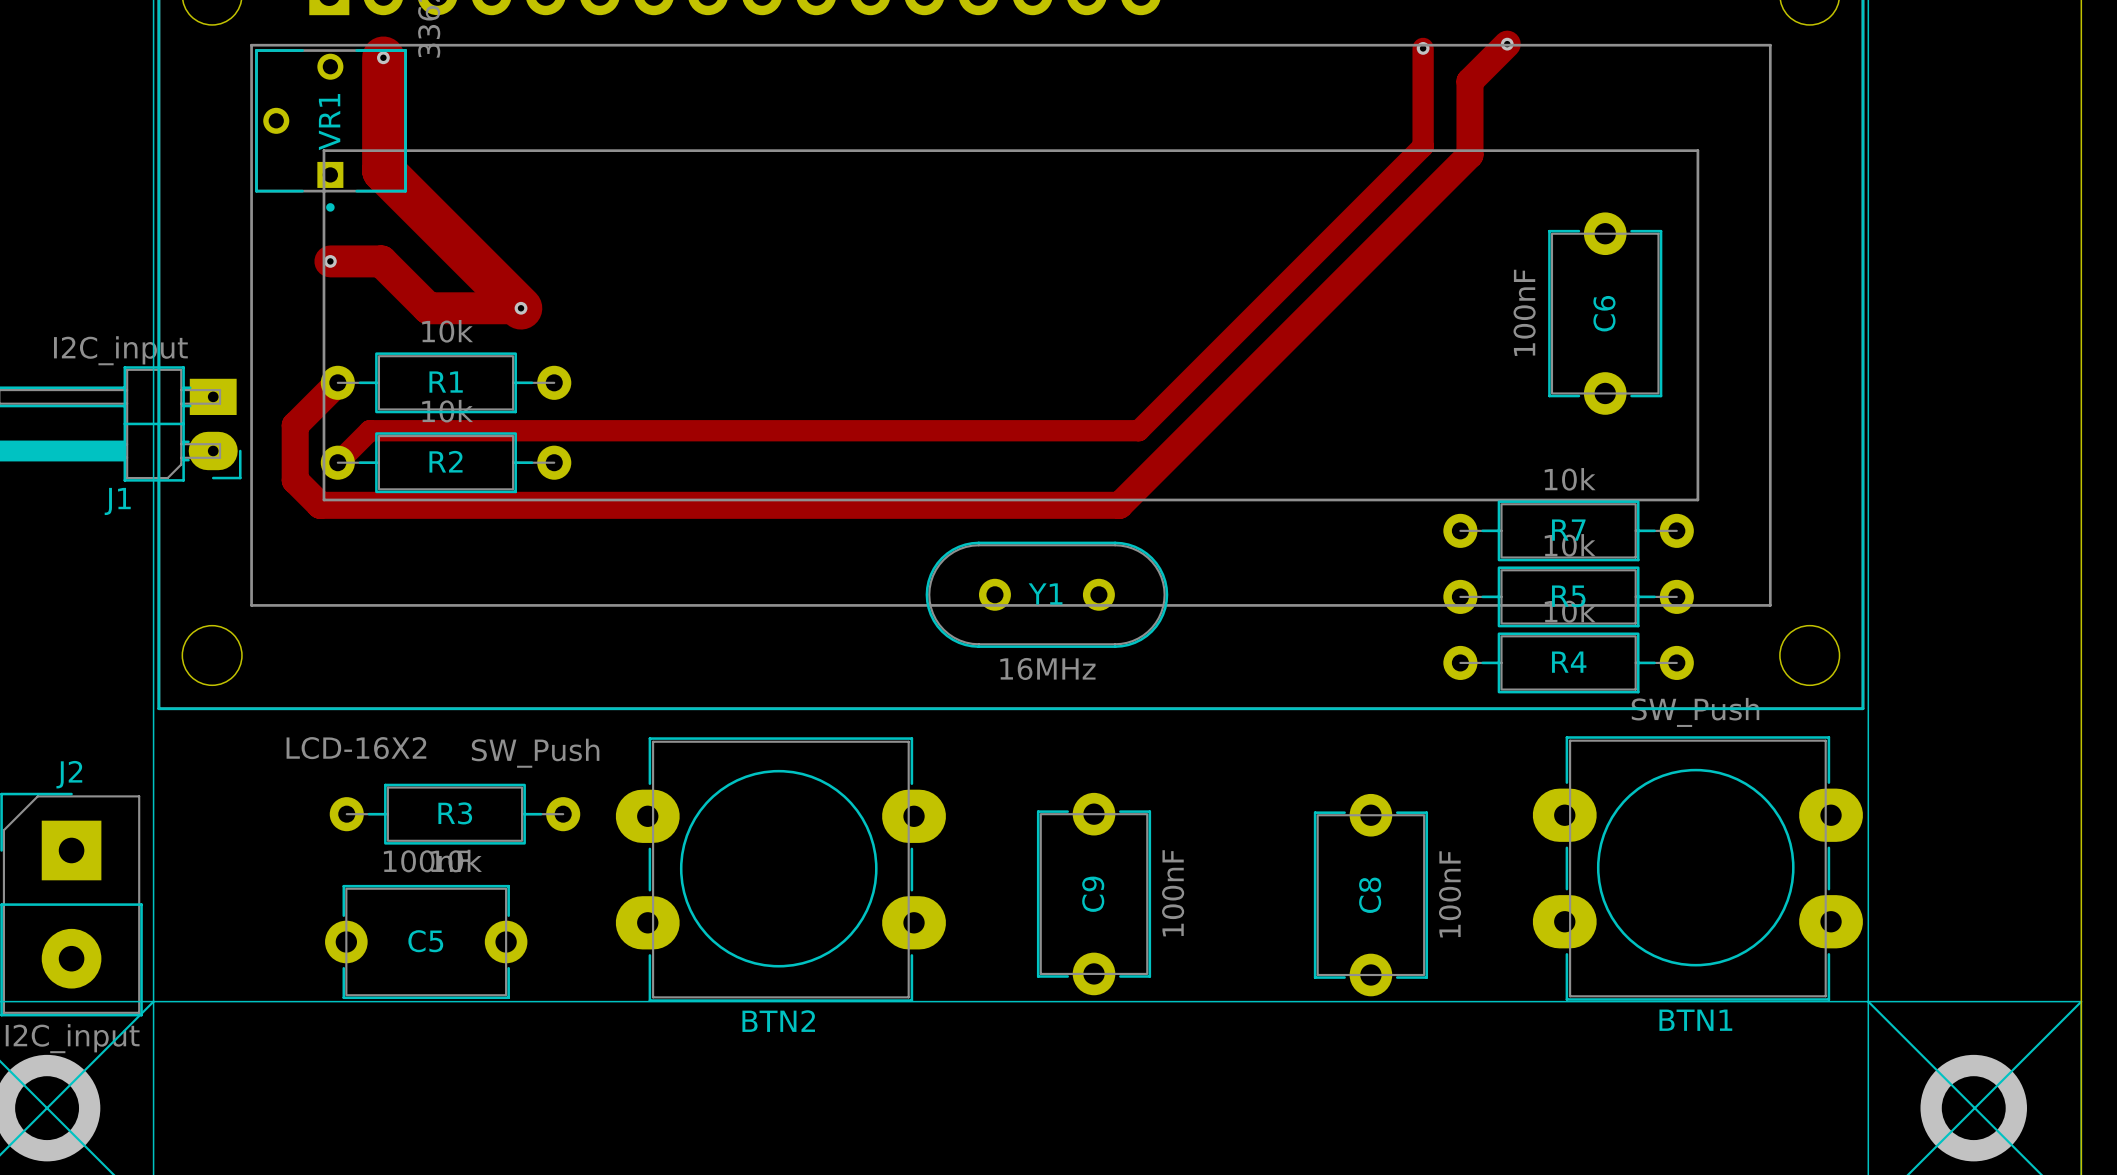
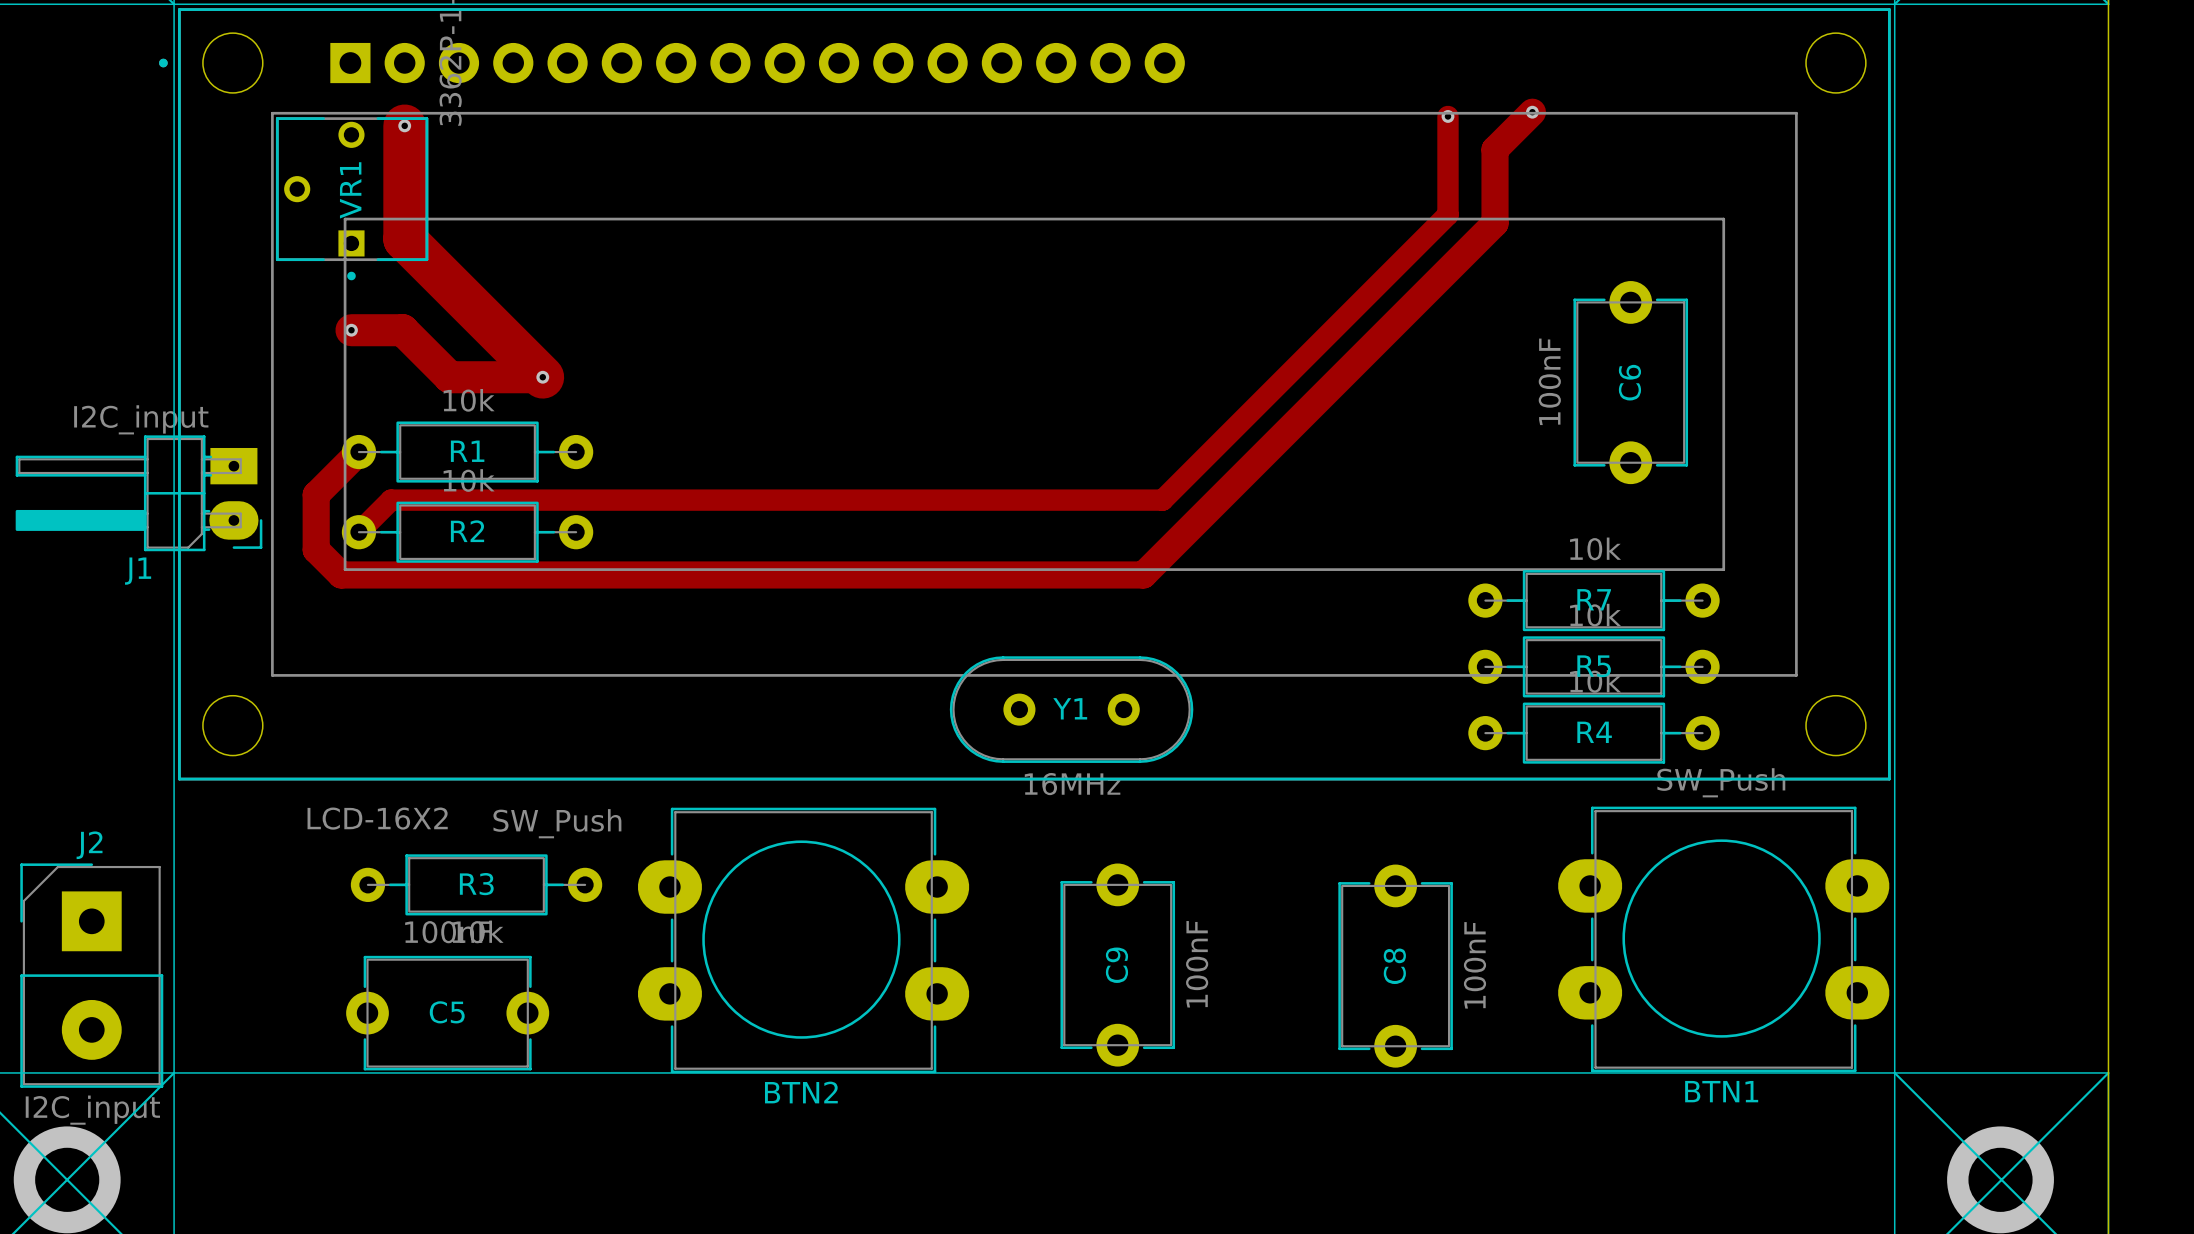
Y1 position: (1046, 594) -> (1071, 709)

